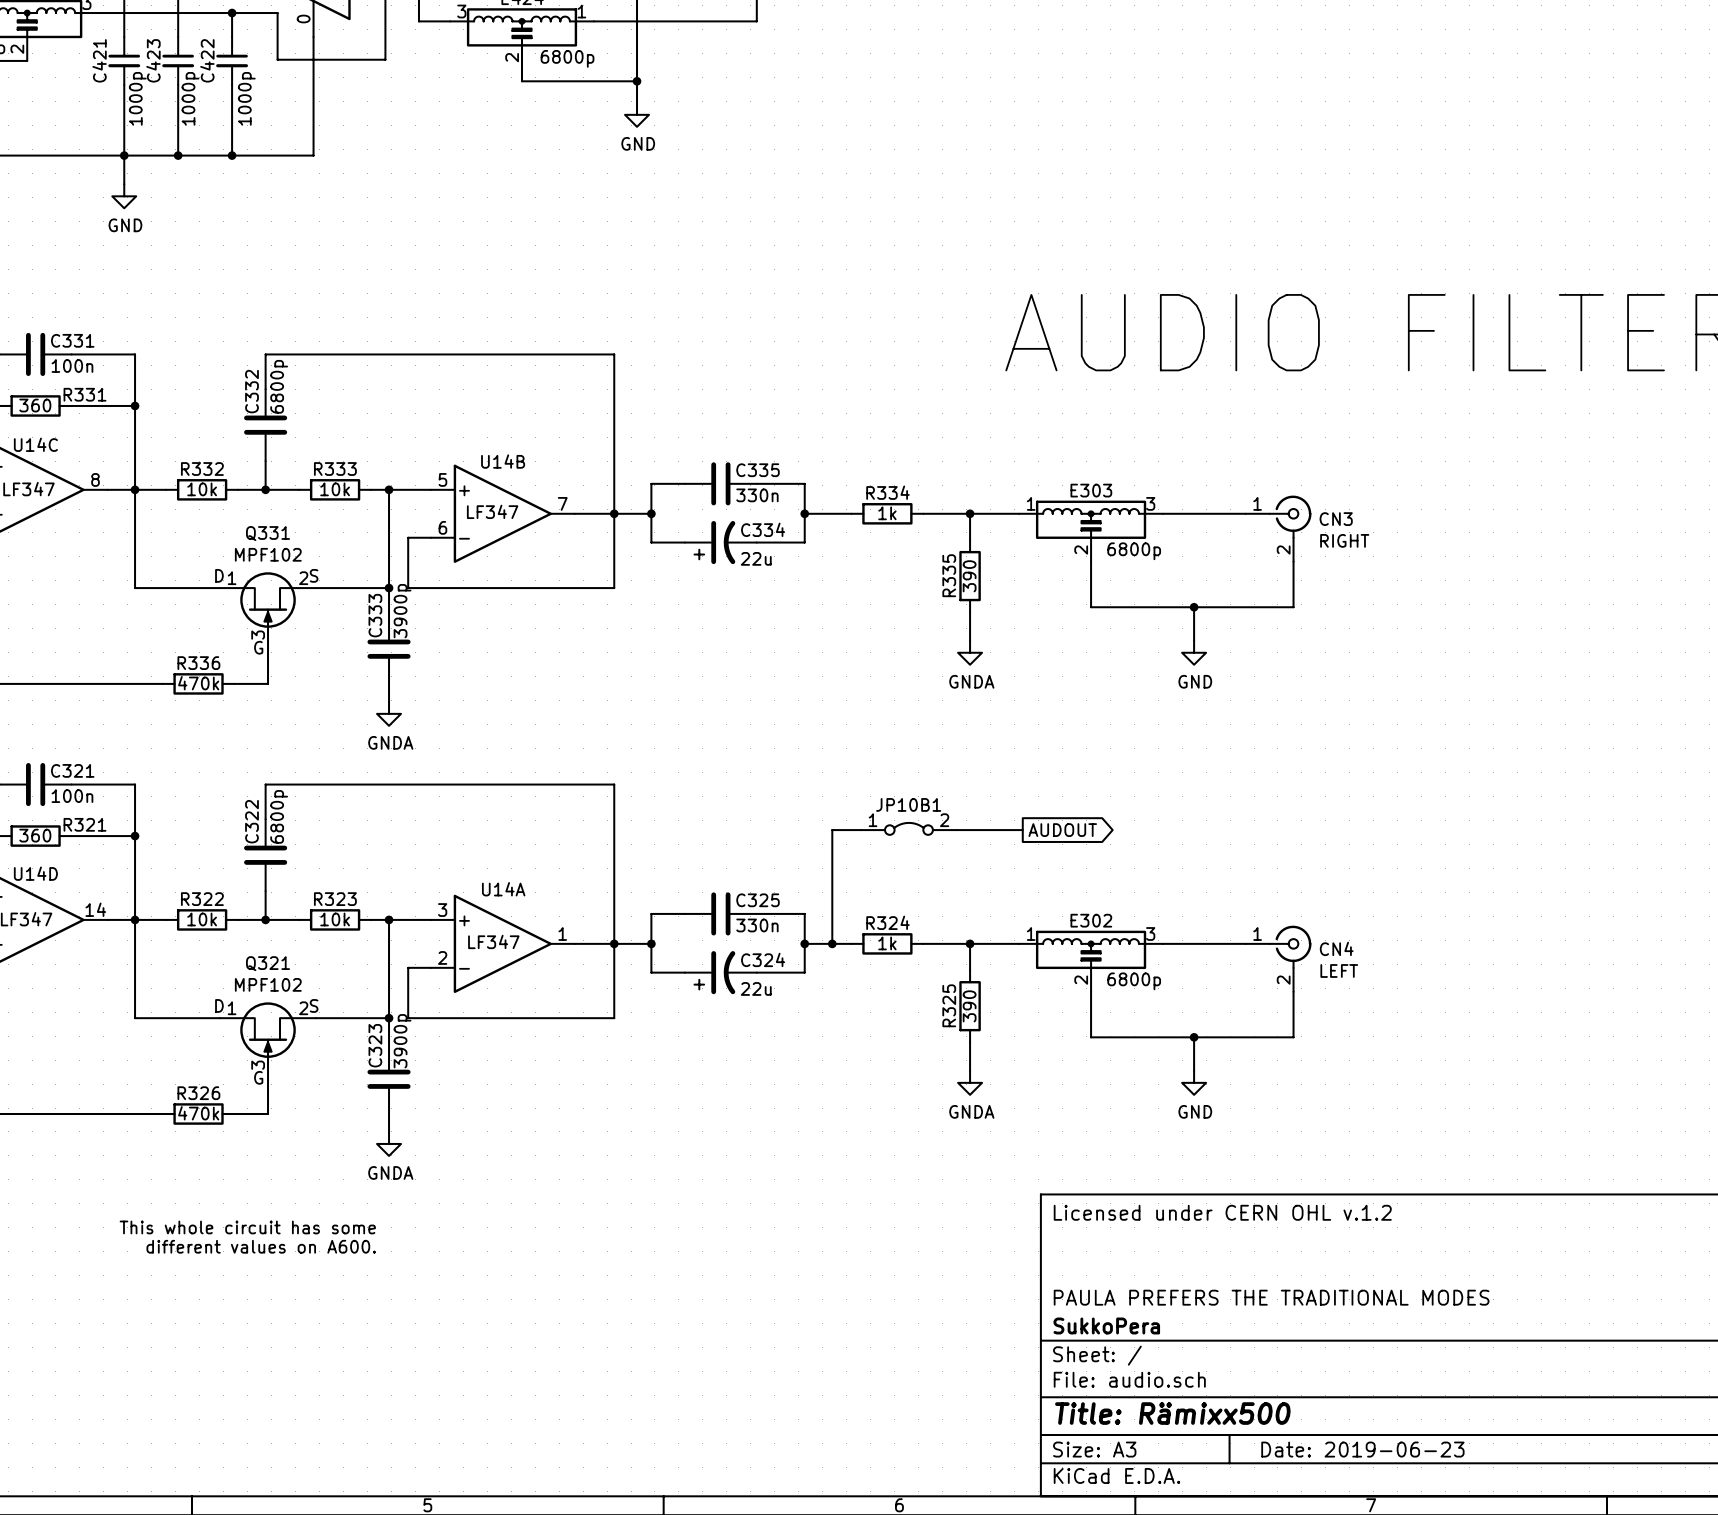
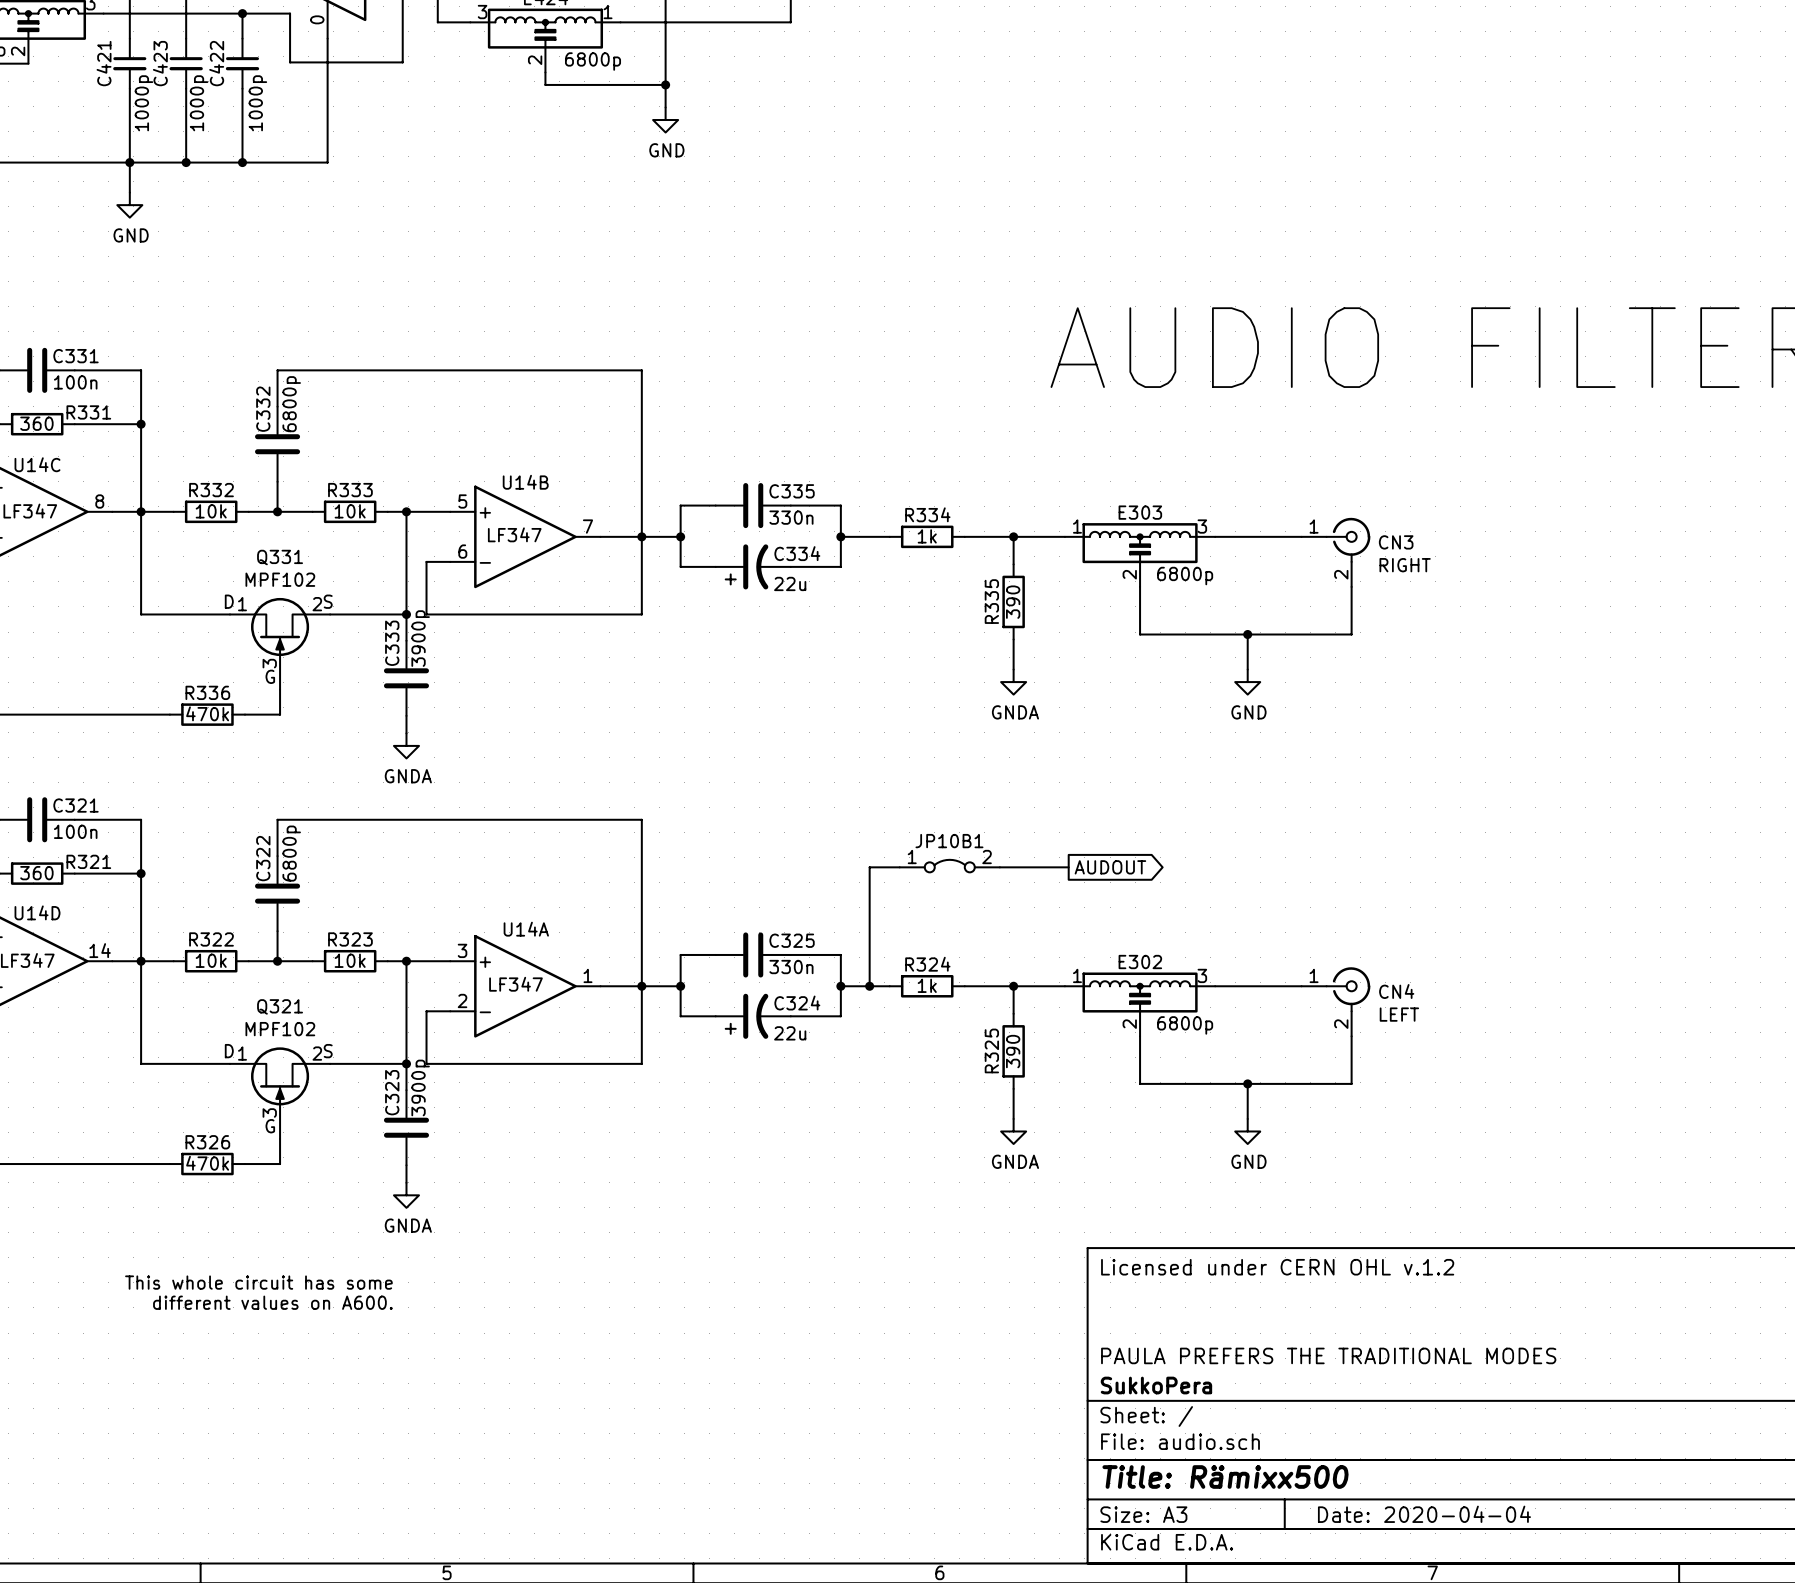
title block: Date: 2019-06-23 (1362, 1449) -> Date: 2020-04-04 (1424, 1514)

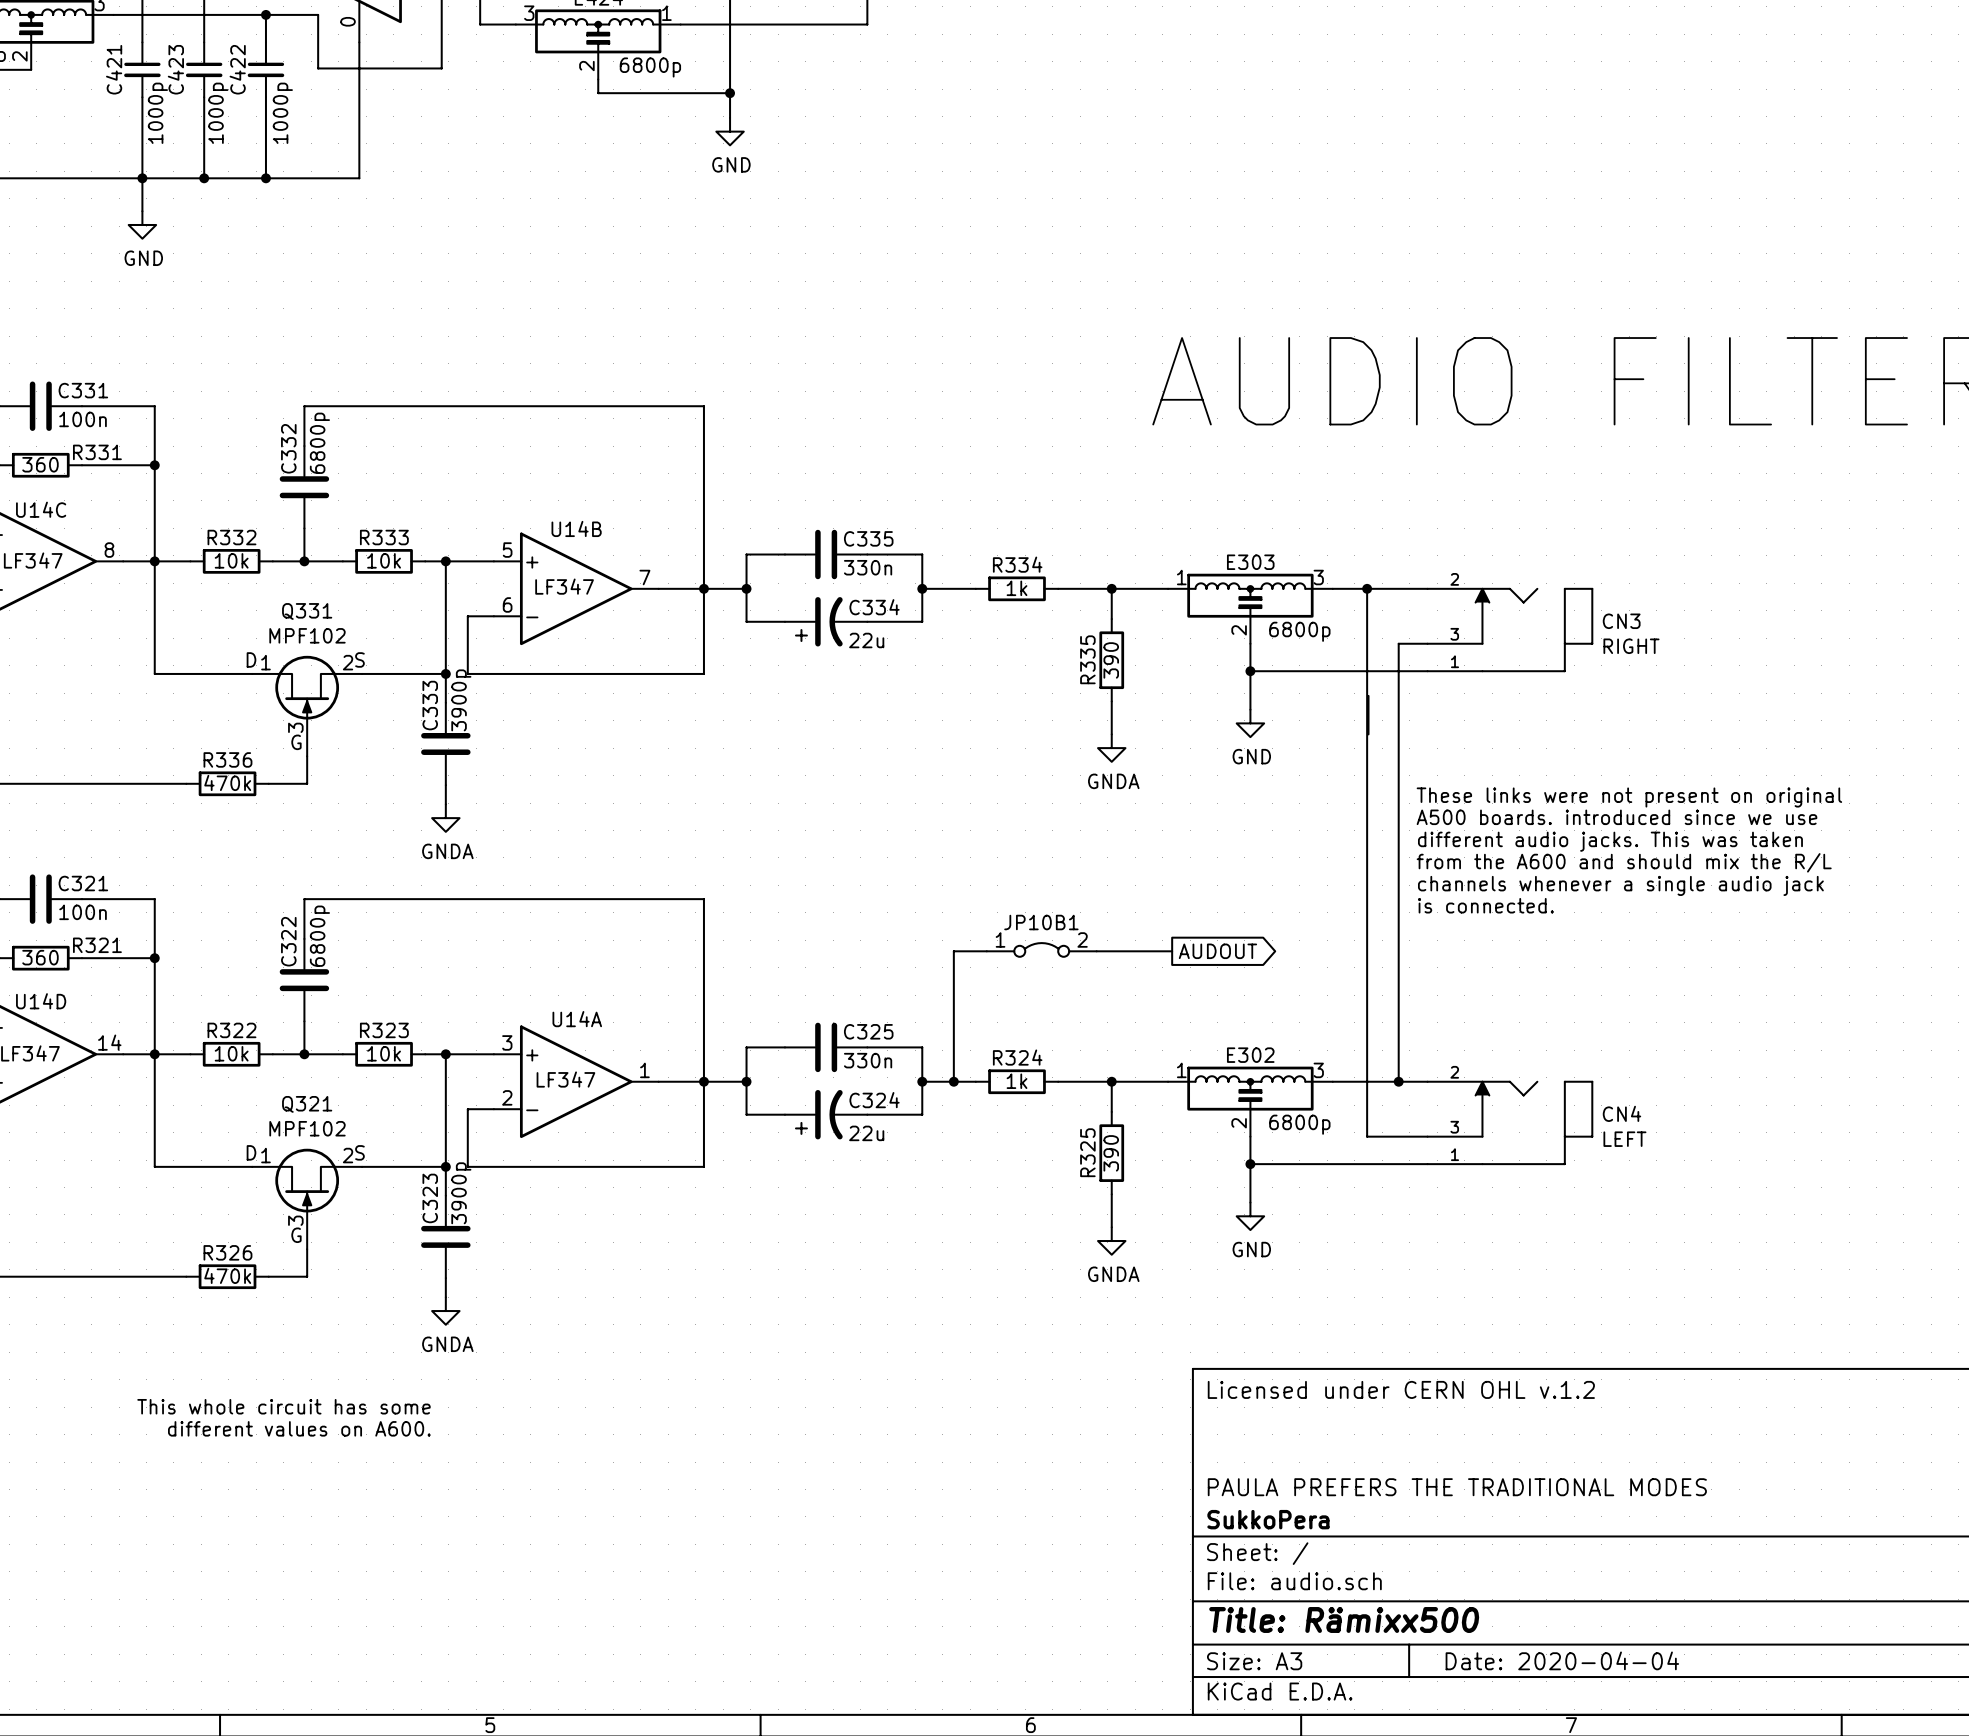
CN3 symbol: [1301, 517, 1371, 587] -> [1427, 588, 1594, 673]
wire: none -> (1367, 588) (1367, 1136) (1427, 1136)
junction: none -> (1367, 588)
CN3 name position: CN3 (1396, 542) -> CN3 (1621, 621)
CN3 value position: RIGHT (1405, 565) -> RIGHT (1631, 646)
wire: none -> (1427, 643) (1398, 643) (1398, 1081)
wire: (1351, 586) (1351, 634) (1140, 634) -> (1250, 709) (1250, 695)
wire: none -> (1250, 671) (1427, 671)
junction: none -> (1250, 671)
junction: (1247, 634) -> none
power symbol position: GND (1247, 682) -> GND (1250, 723)
text: none -> These links were not present on original (1629, 797)
text: none -> A500 boards. introduced since we use (1616, 817)
text: none -> different audio jacks. This was taken (1610, 841)
text: none -> from the A600 and should mix the R/L (1624, 862)
text: none -> channels whenever a single audio jack (1620, 885)
text: none -> is connected. (1485, 905)
CN4 symbol: [1301, 967, 1371, 1037] -> [1427, 1080, 1594, 1165]
junction: none -> (1398, 1081)
CN4 name position: CN4 (1396, 991) -> CN4 (1622, 1113)
CN4 value position: LEFT (1399, 1014) -> LEFT (1624, 1139)
wire: (1351, 1036) (1351, 1083) (1140, 1083) -> (1250, 1202) (1250, 1188)
wire: none -> (1250, 1164) (1427, 1164)
junction: none -> (1250, 1164)
wire: (1247, 1083) (1247, 1118) -> none
junction: (1247, 1083) -> none
power symbol position: GND (1247, 1131) -> GND (1250, 1216)

